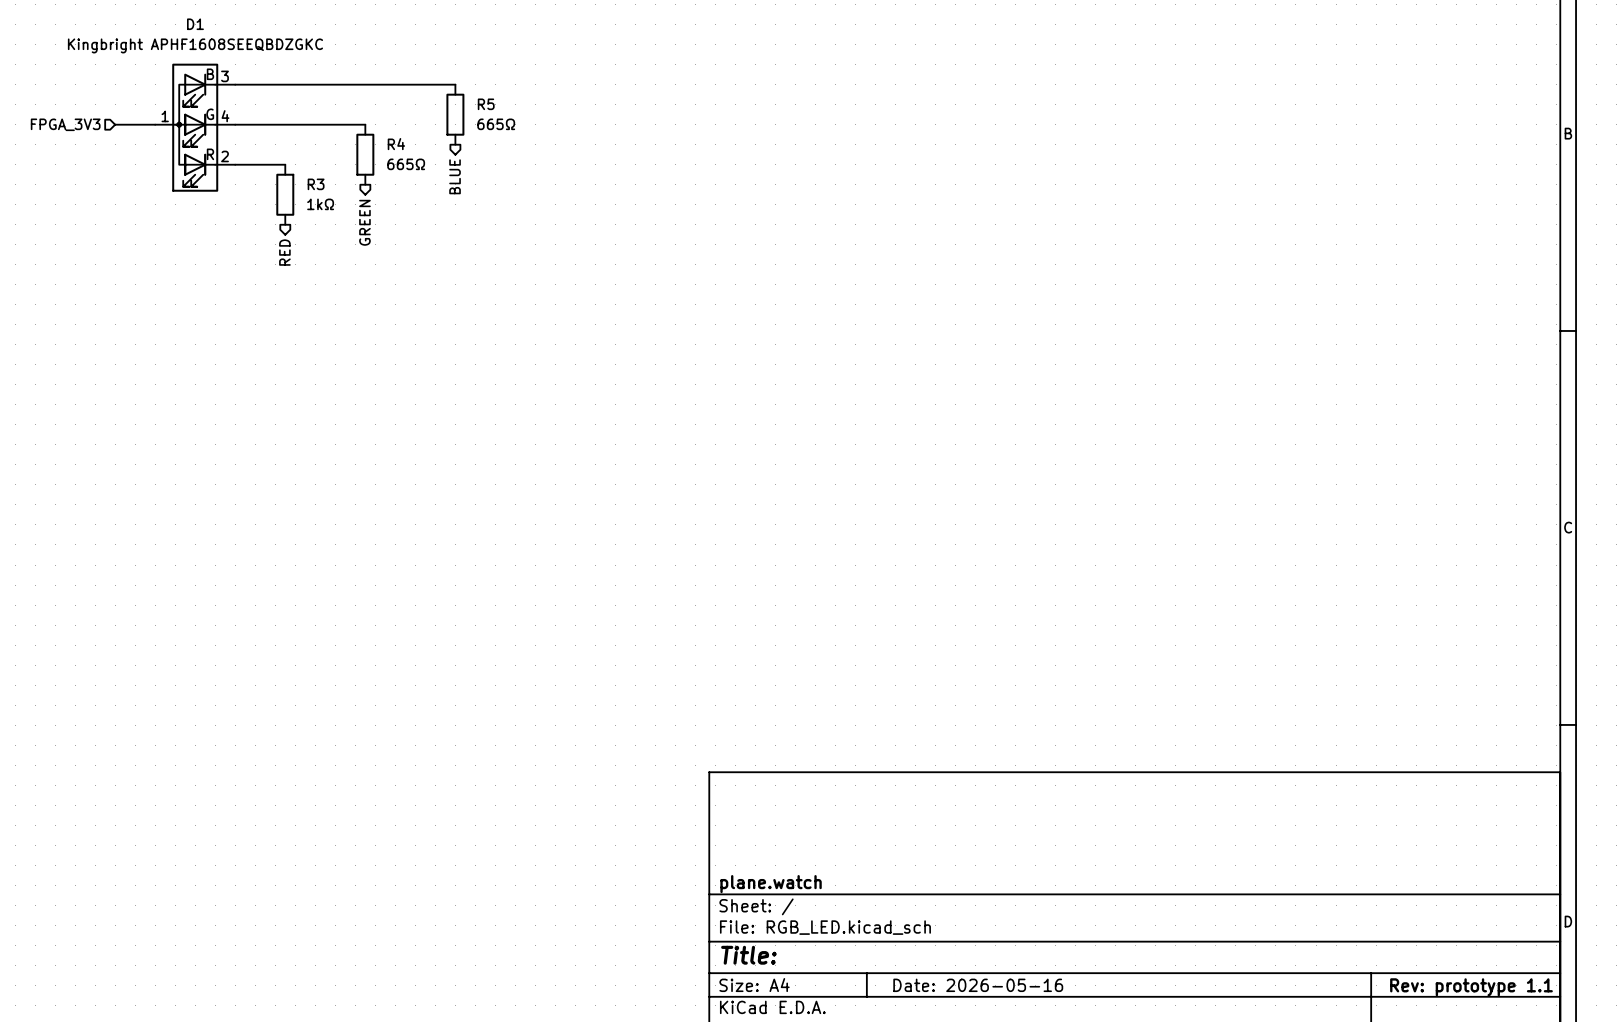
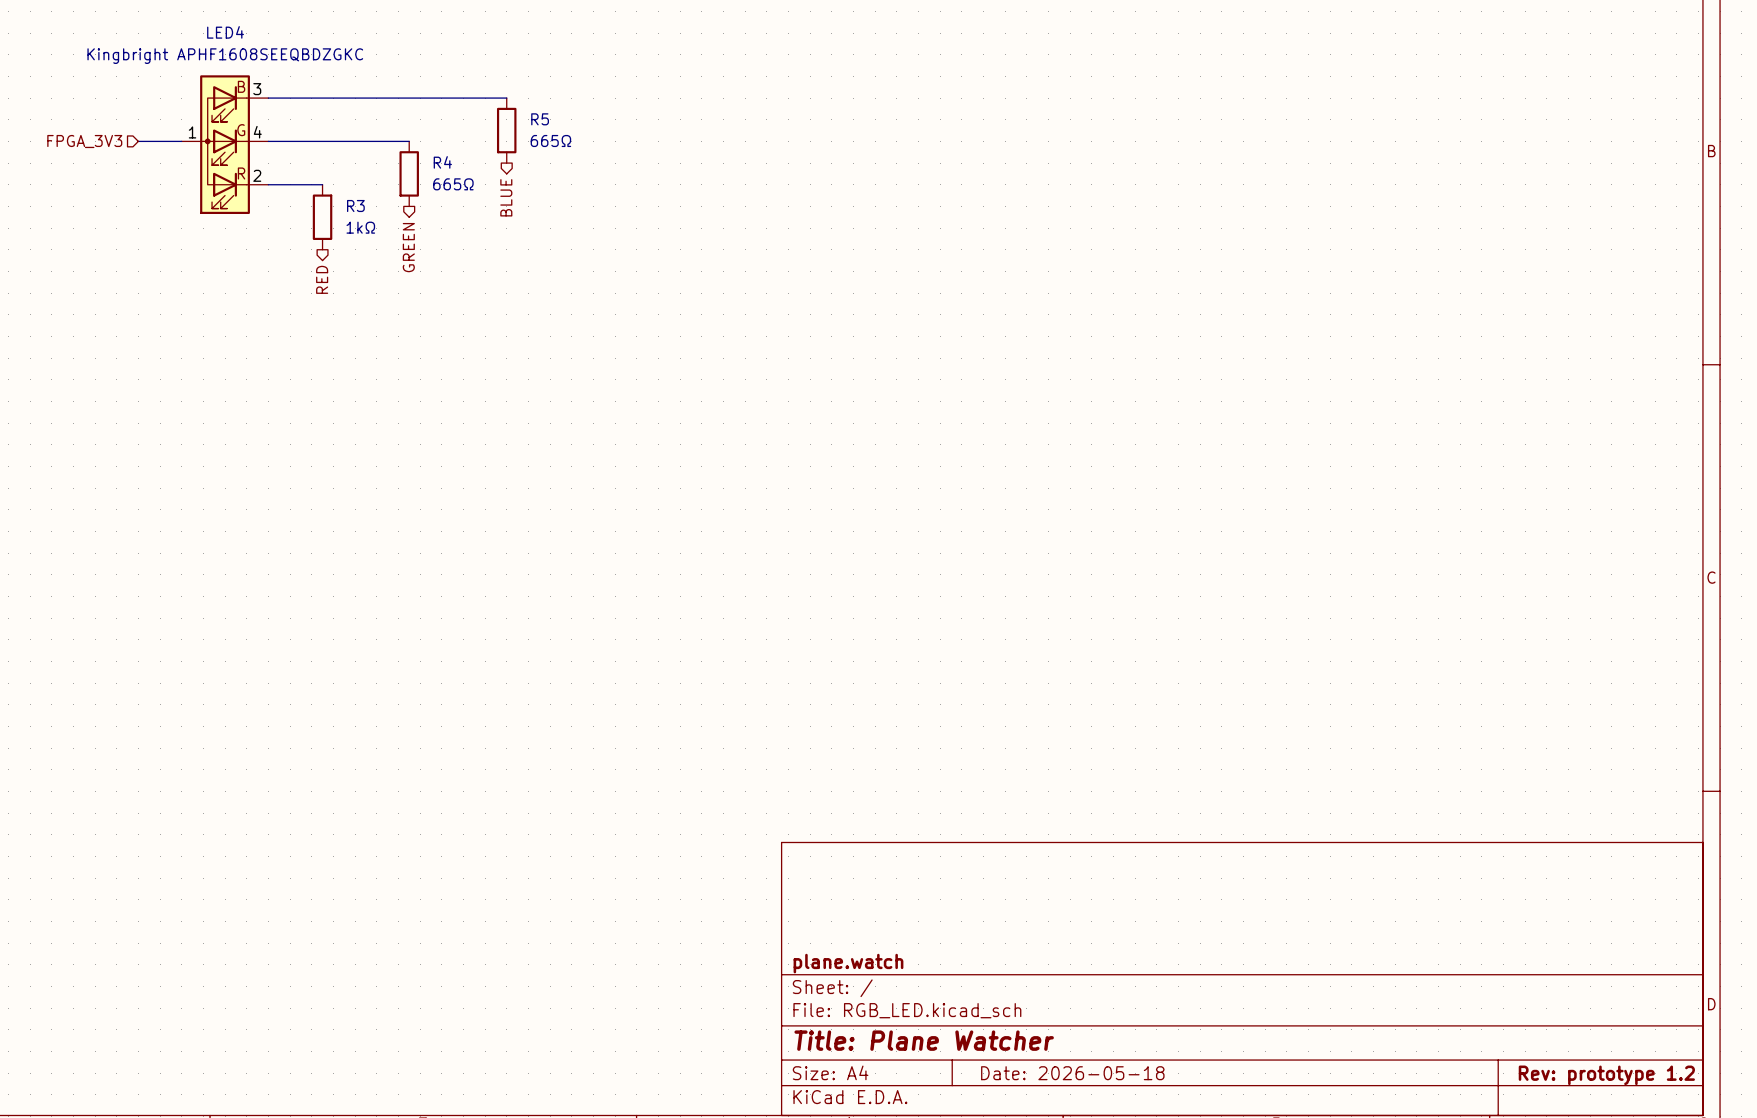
D1 name: D1 (195, 24) -> LED4 (225, 32)
title block: Title: (748, 955) -> Title: Plane Watcher (924, 1040)
title block: Date: 2026-05-16 (978, 985) -> Date: 2026-05-18 (1072, 1073)
title block: Rev: prototype 1.1 (1471, 987) -> Rev: prototype 1.2 (1606, 1075)

